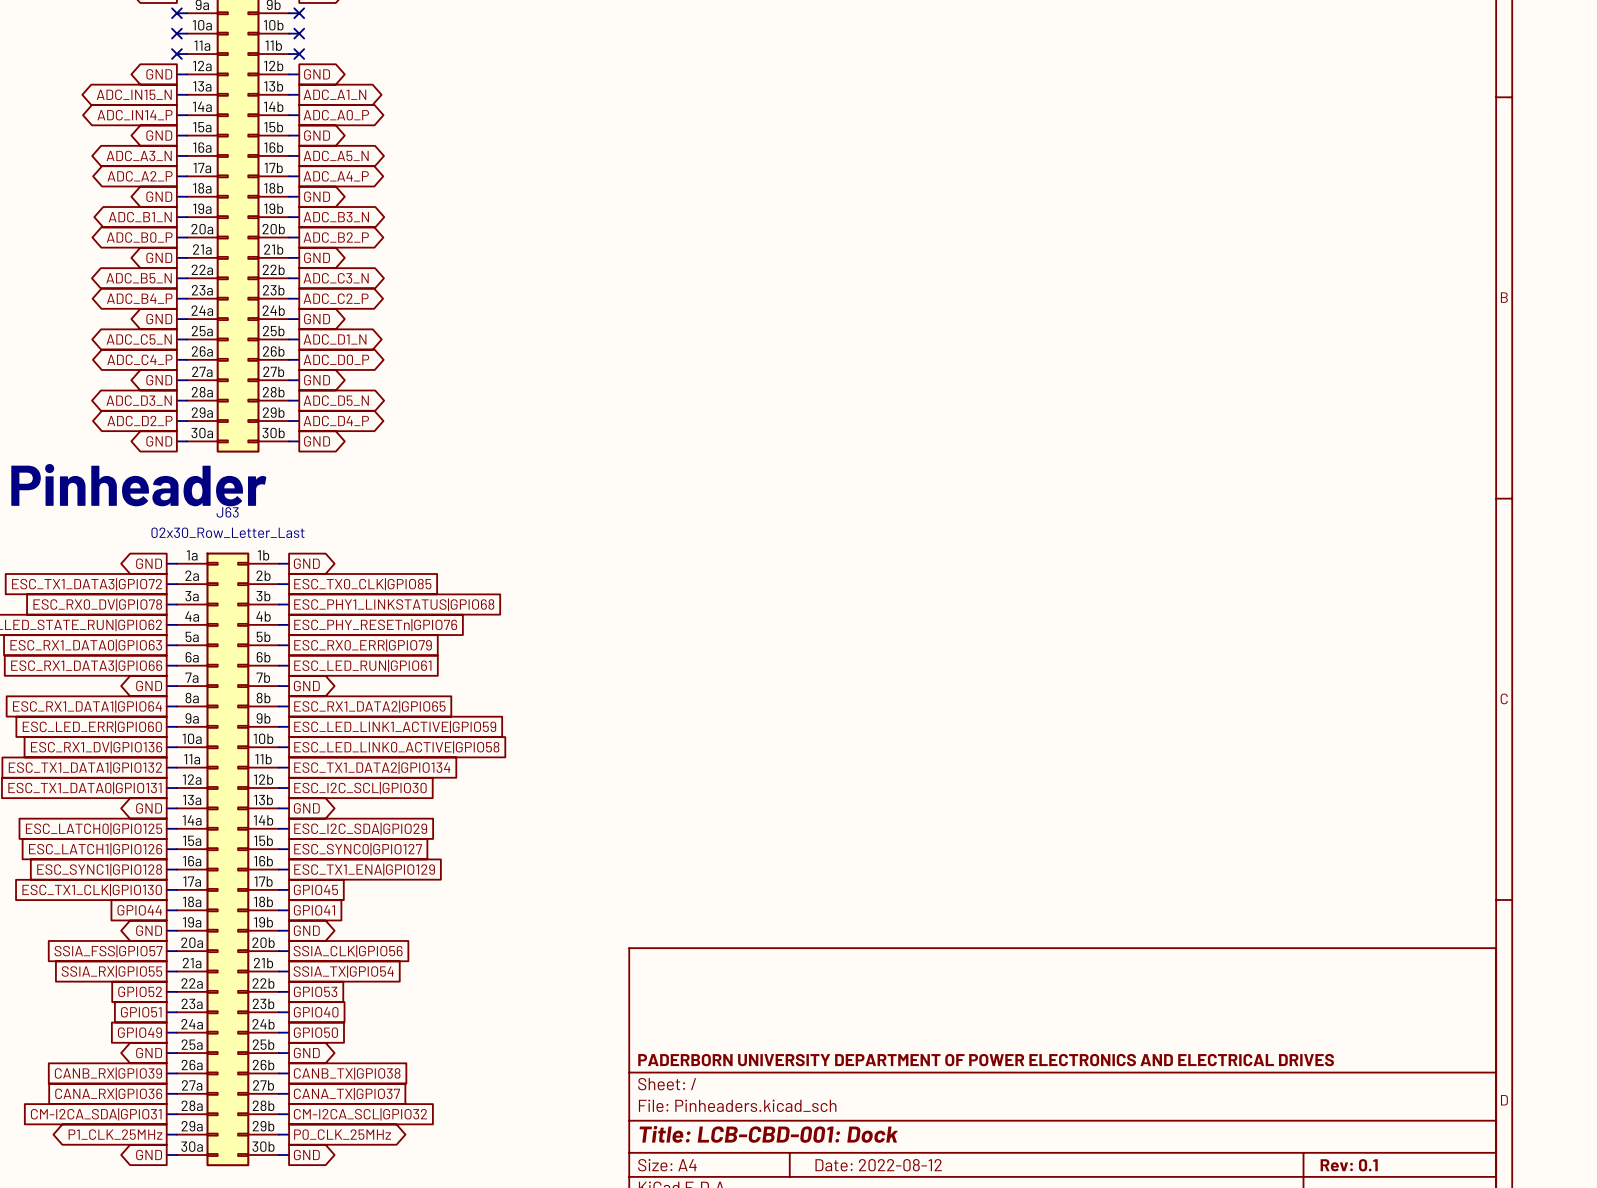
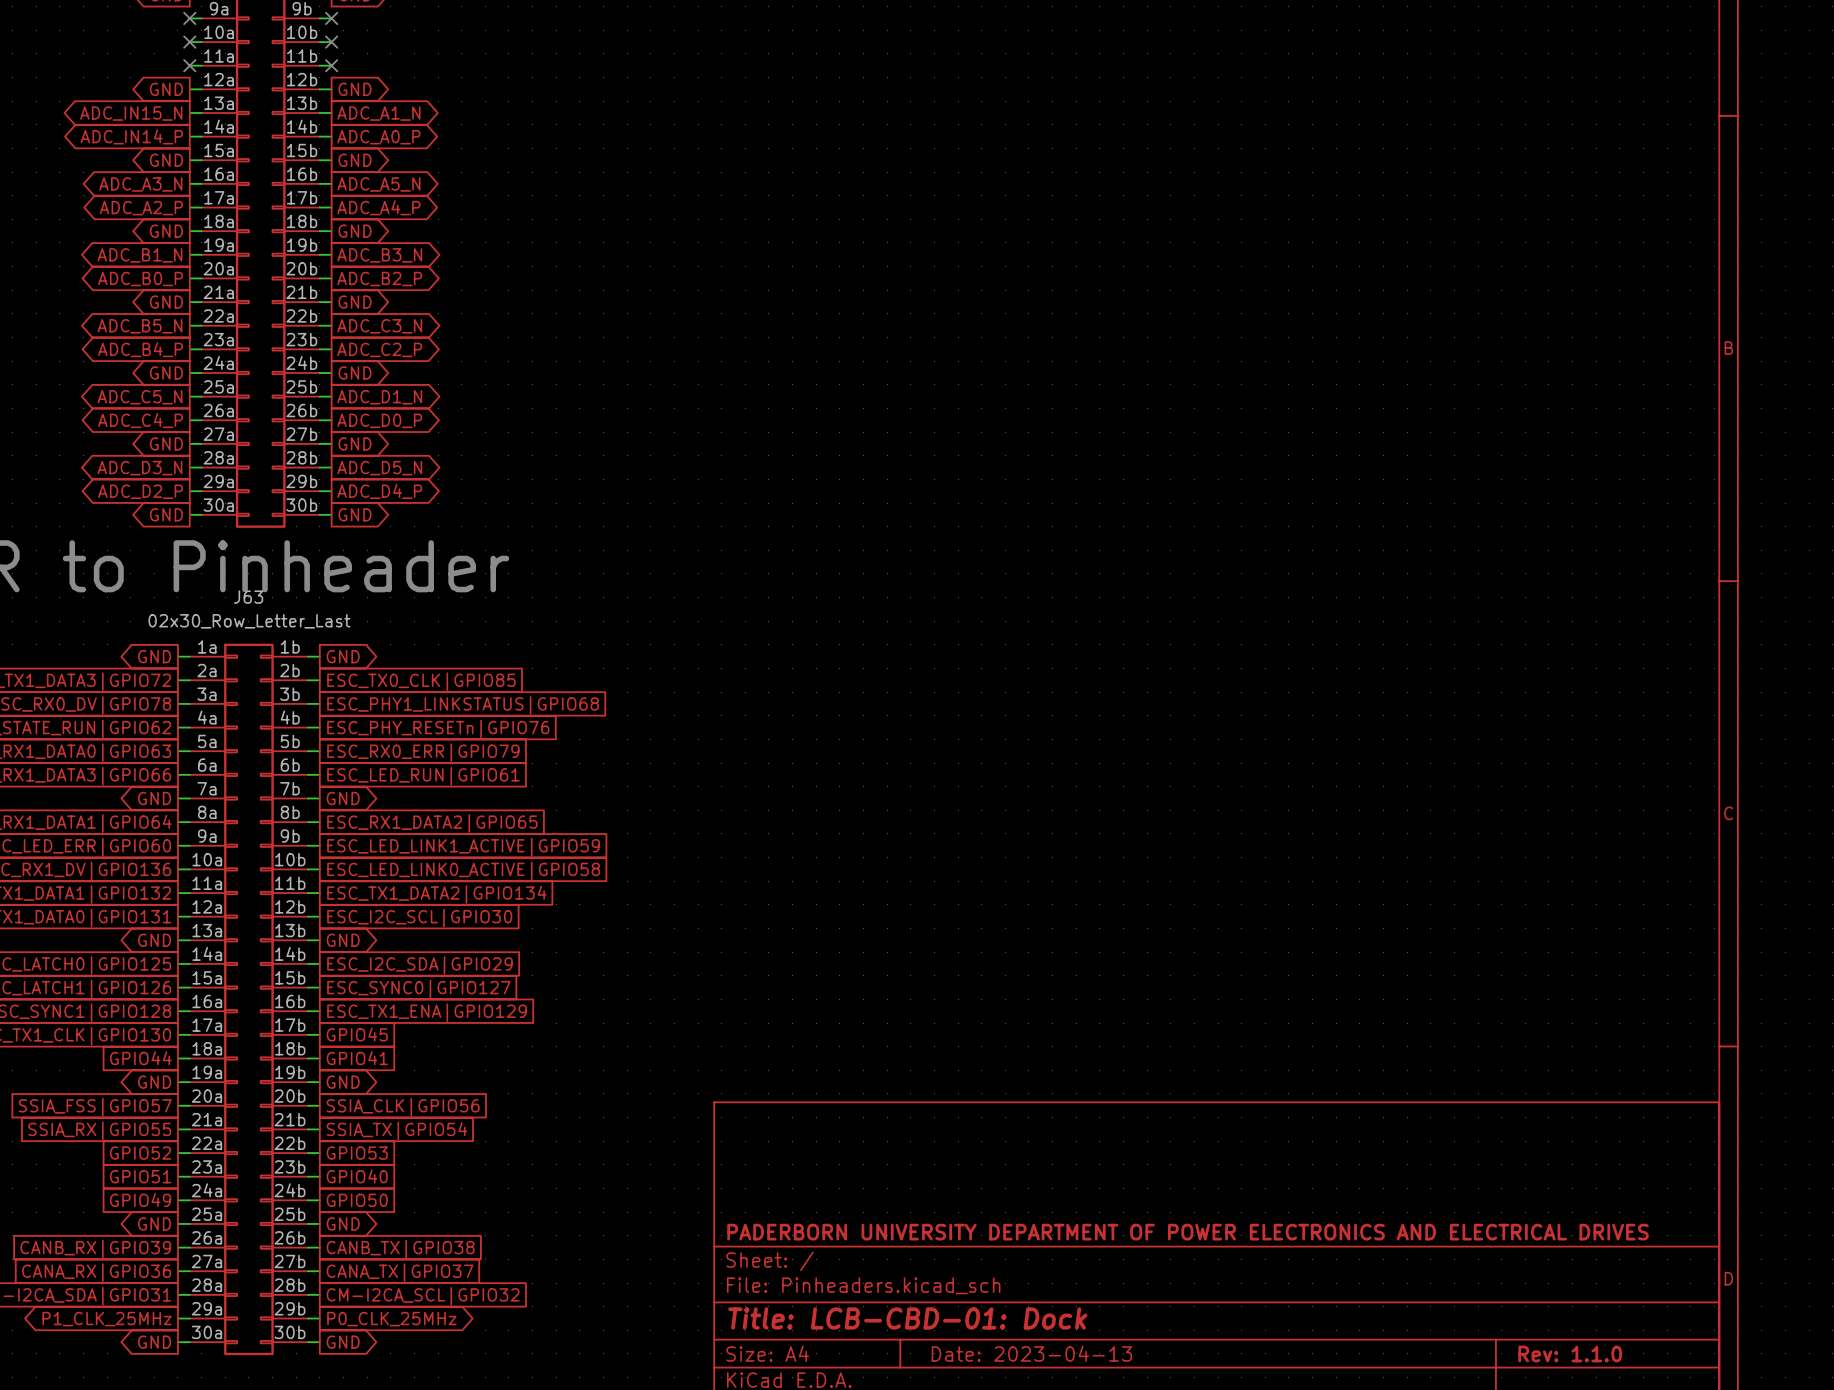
title block: Title: LCB-CBD-001: Dock (768, 1134) -> Title: LCB-CBD-01: Dock (907, 1318)
title block: Date: 2022-08-12 (878, 1165) -> Date: 2023-04-13 (1031, 1353)
title block: Rev: 0.1 (1349, 1165) -> Rev: 1.1.0 (1570, 1354)

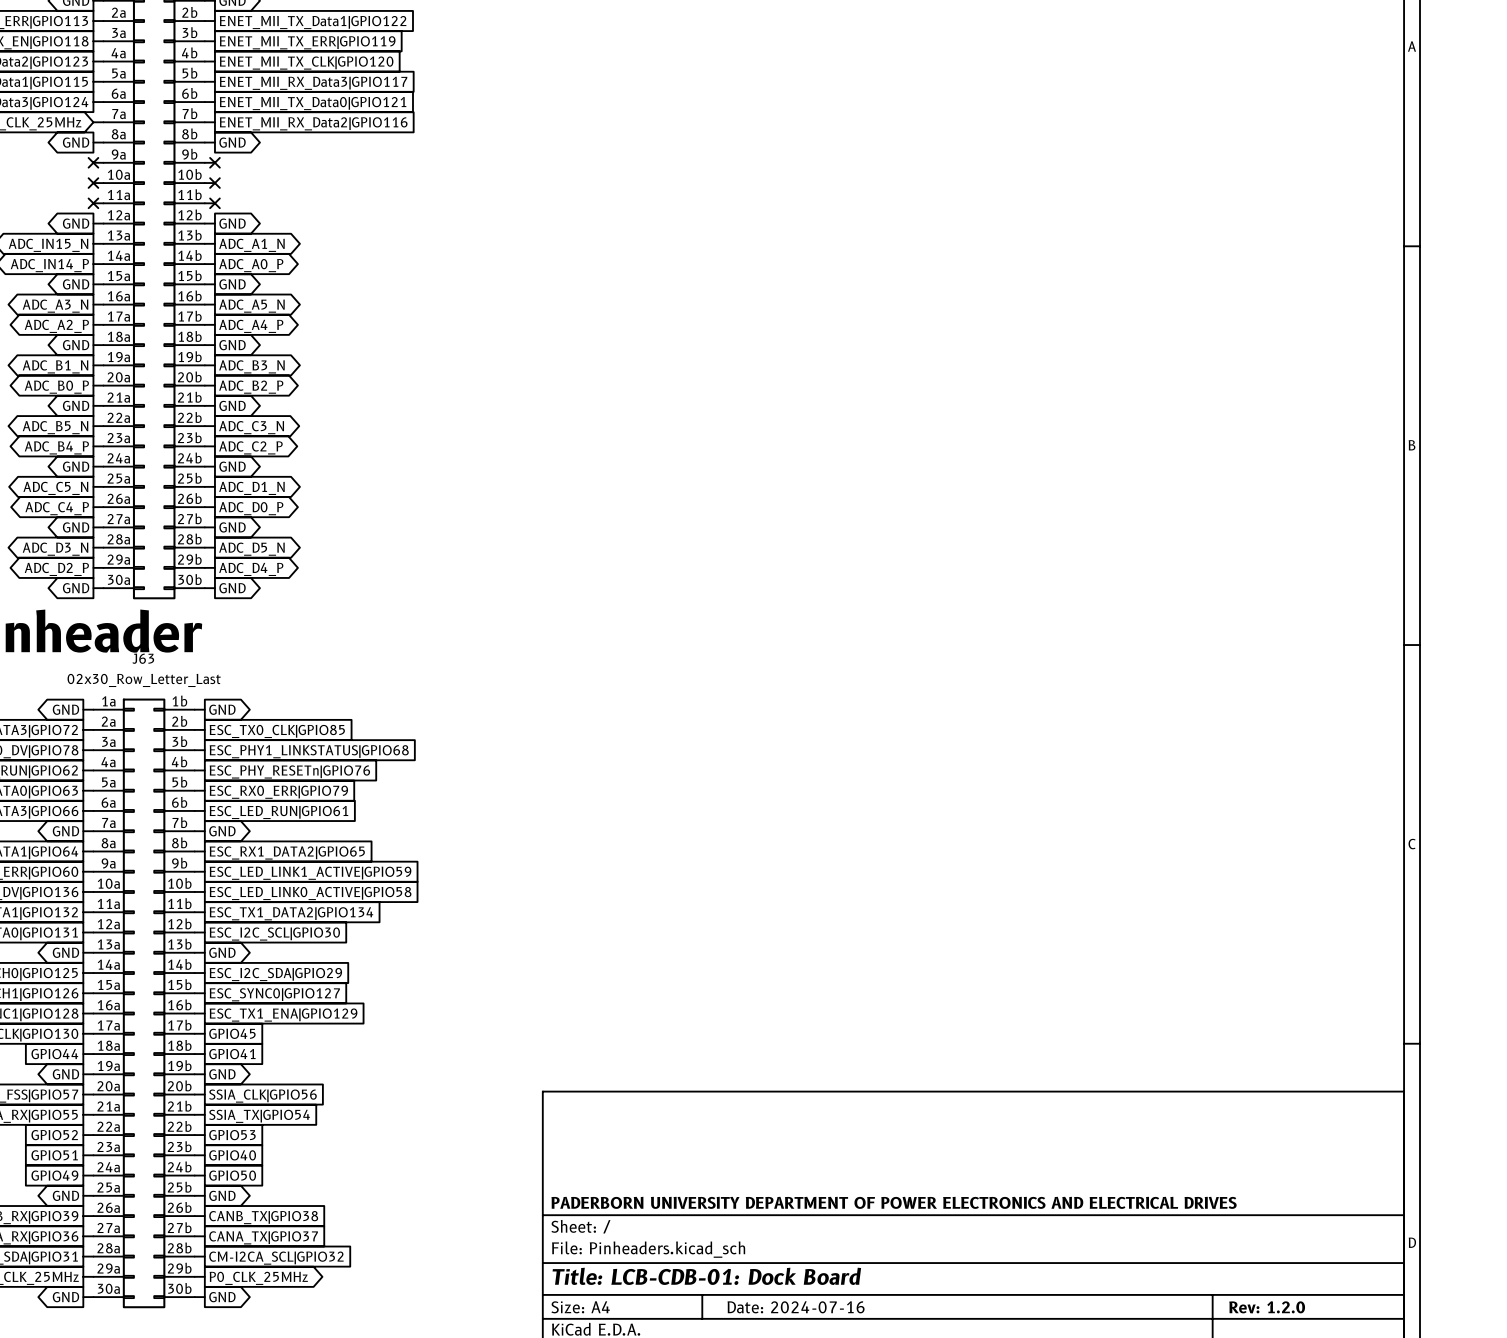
title block: Title: LCB-CBD-01: Dock (907, 1318) -> Title: LCB-CDB-01: Dock Board (706, 1276)
title block: Date: 2023-04-13 (1031, 1353) -> Date: 2024-07-16 (796, 1307)
title block: Rev: 1.1.0 (1570, 1354) -> Rev: 1.2.0 (1267, 1307)

